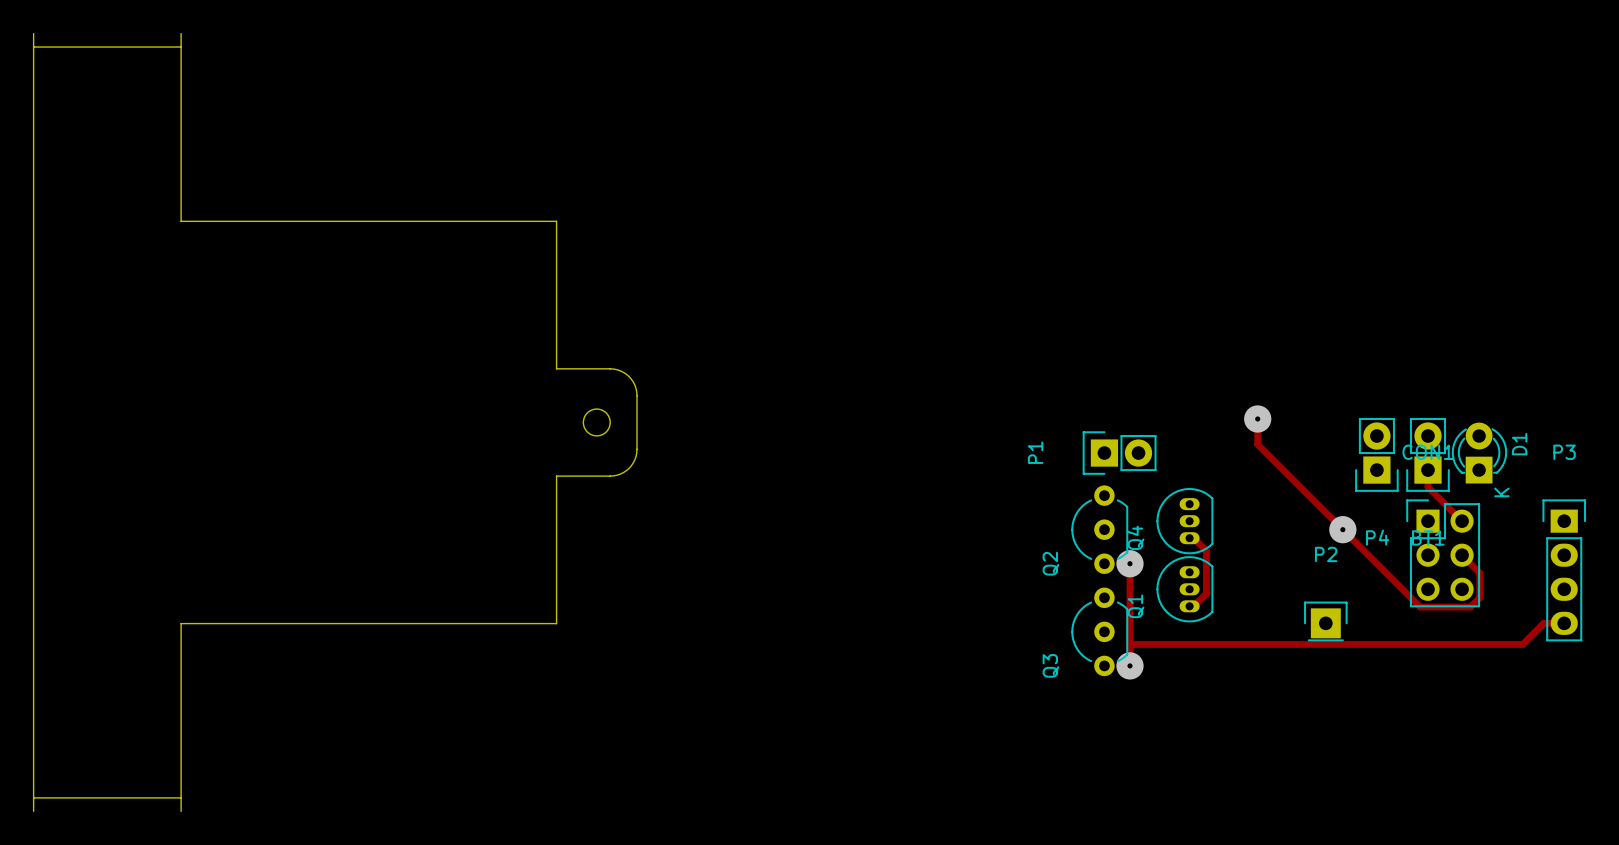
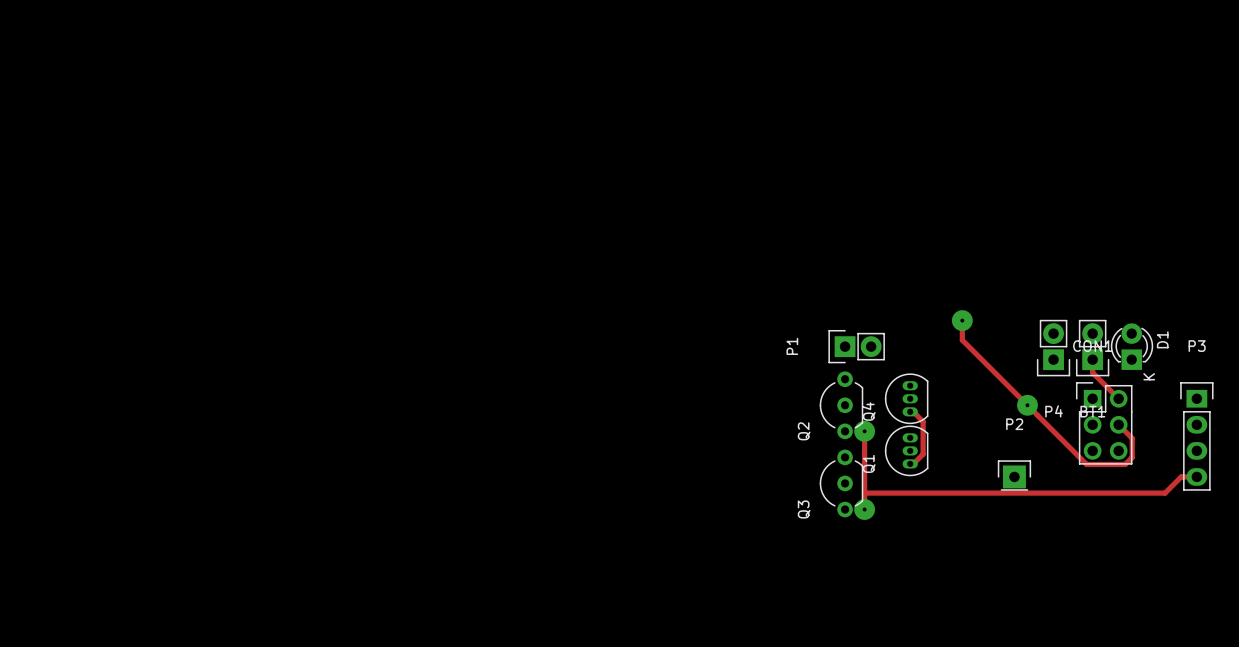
board edge: (33, 33) (33, 811) -> none
board edge: (181, 33) (181, 221) (556, 221) (556, 368) (617, 369) (631, 379) (637, 395) (636, 452) (629, 468) (613, 475) (556, 476) (556, 623) (181, 623) (181, 811) -> none
board edge: (33, 47) (181, 47) -> none
round board edge: [582, 408, 611, 437] -> none
board edge: (33, 797) (181, 797) -> none

